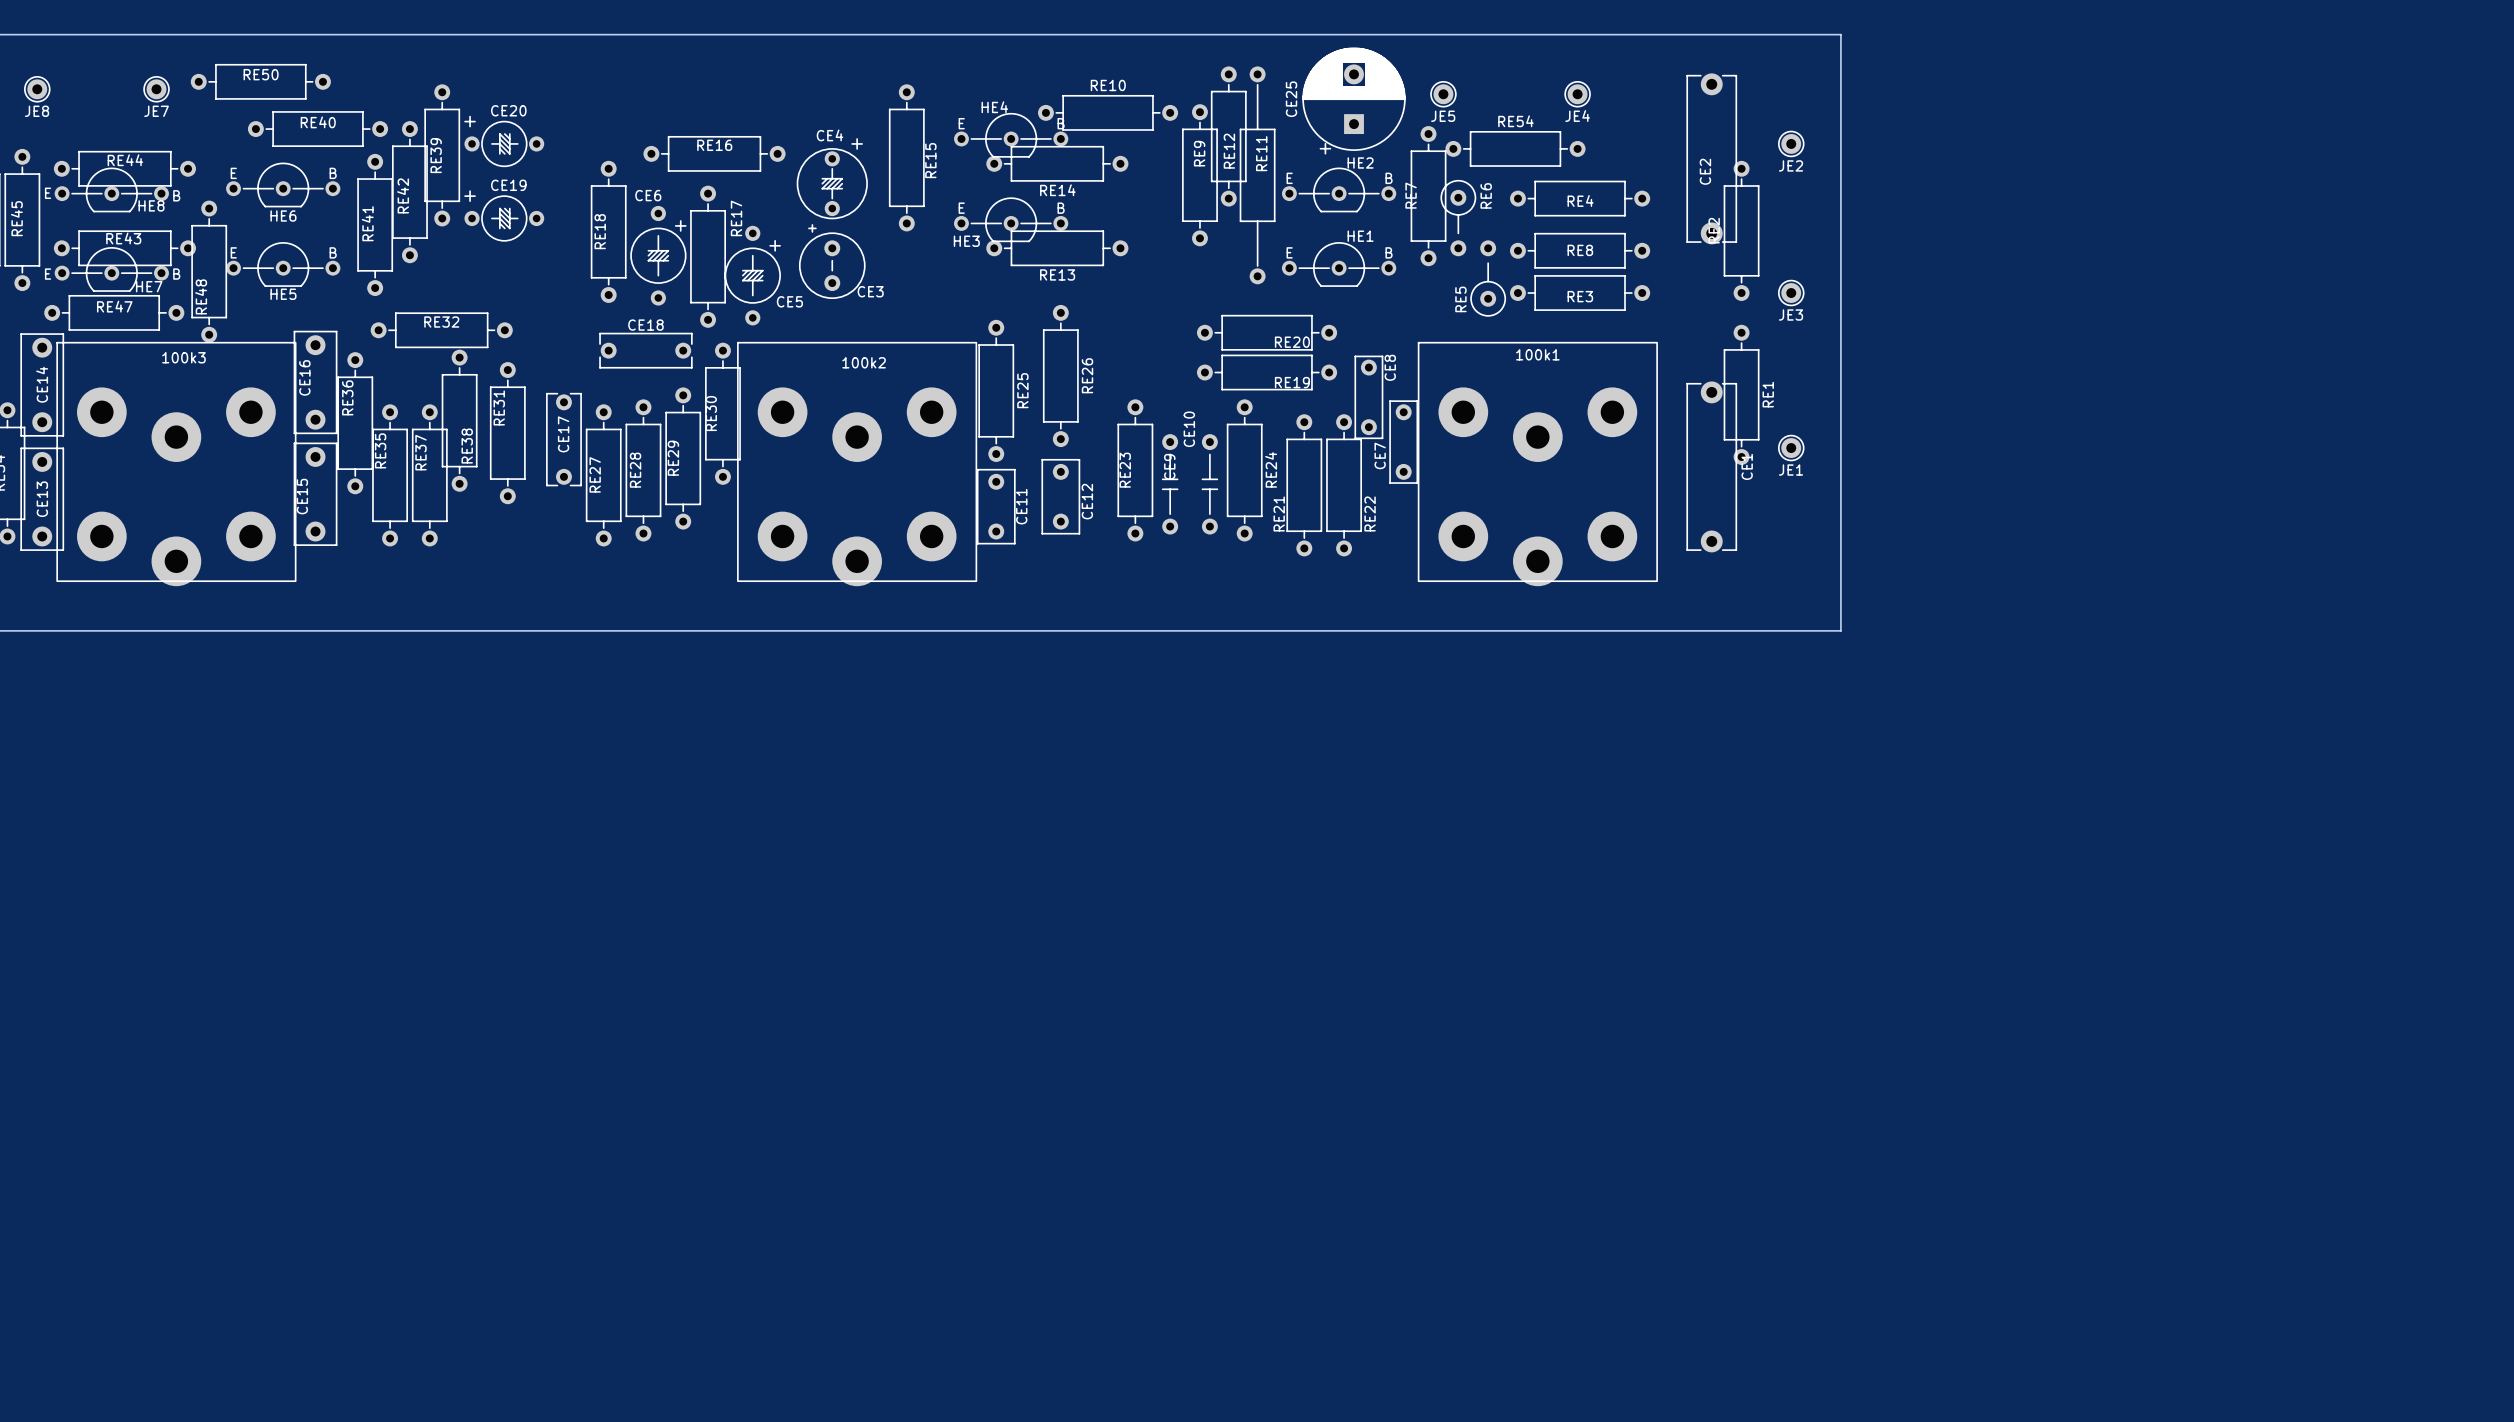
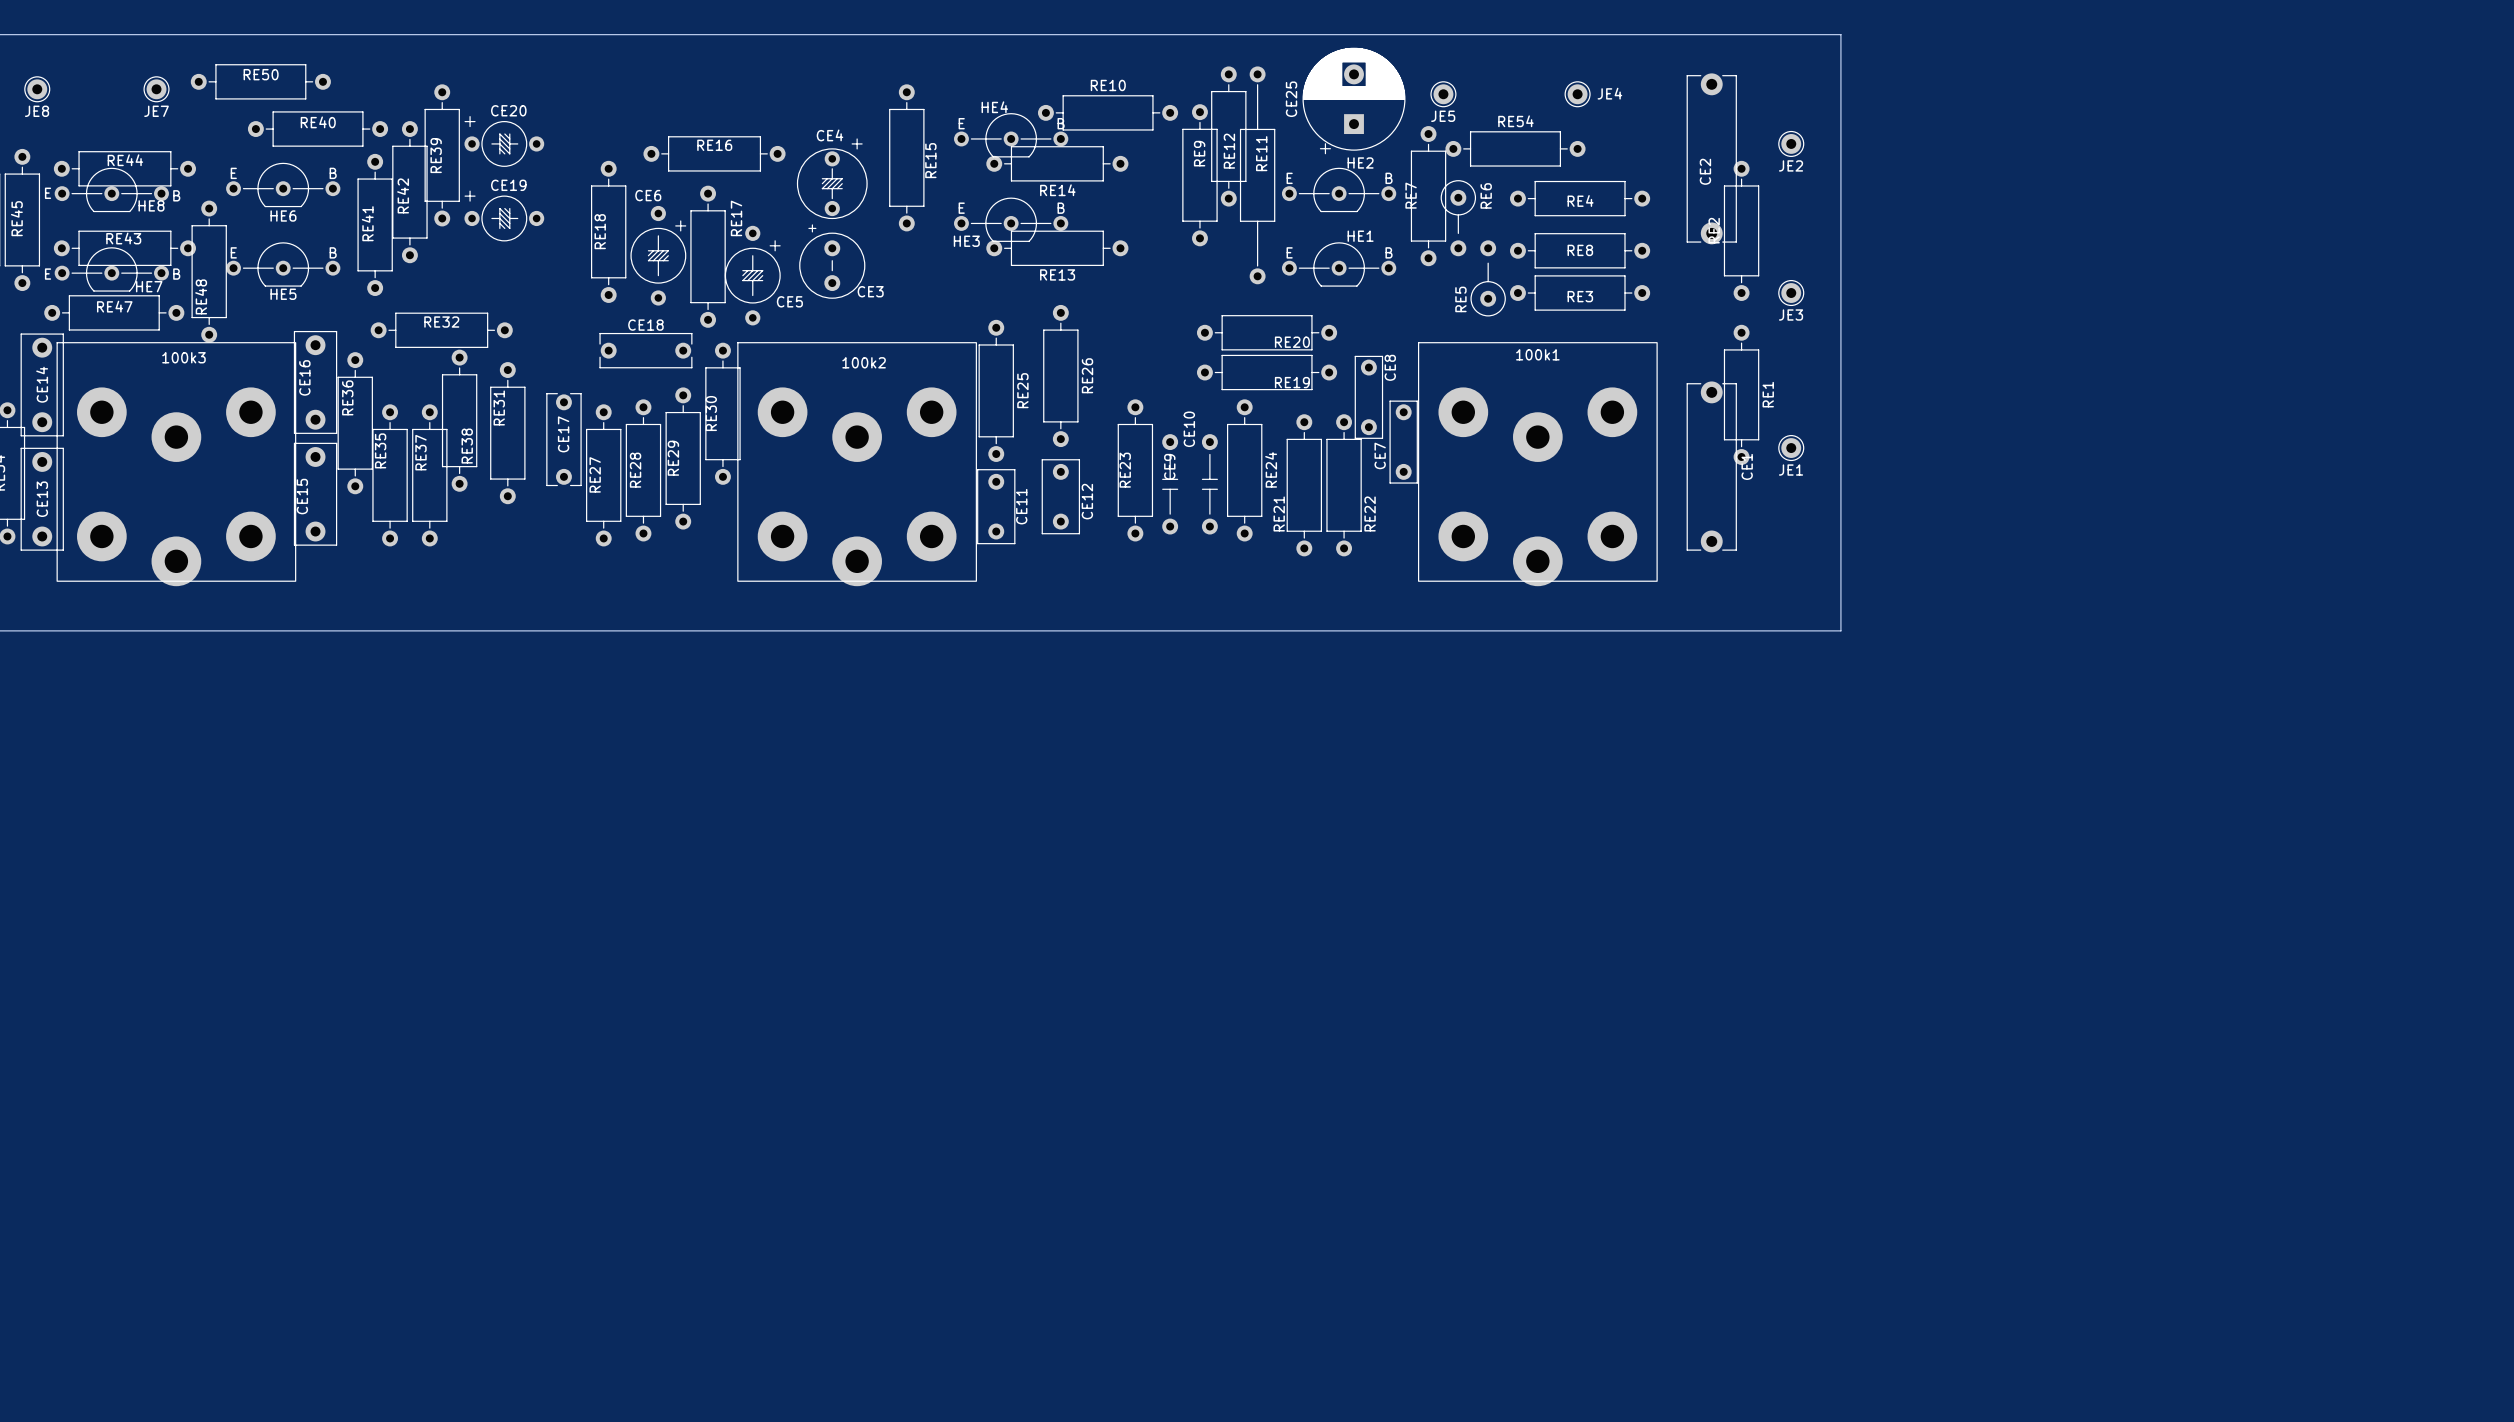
JE4 name position: JE4 (1577, 116) -> JE4 (1609, 93)

